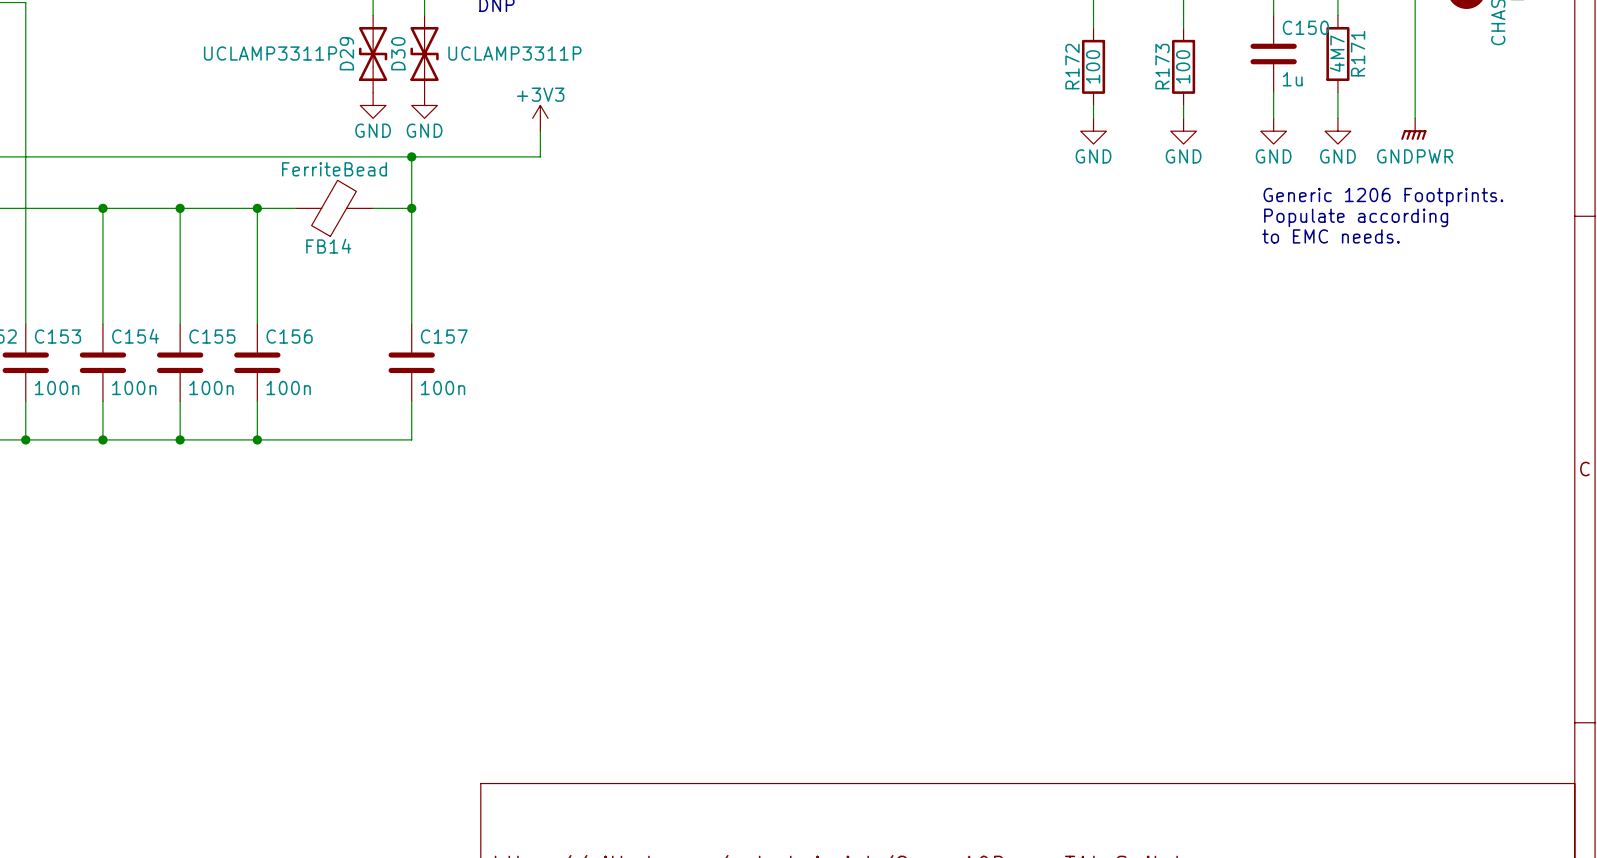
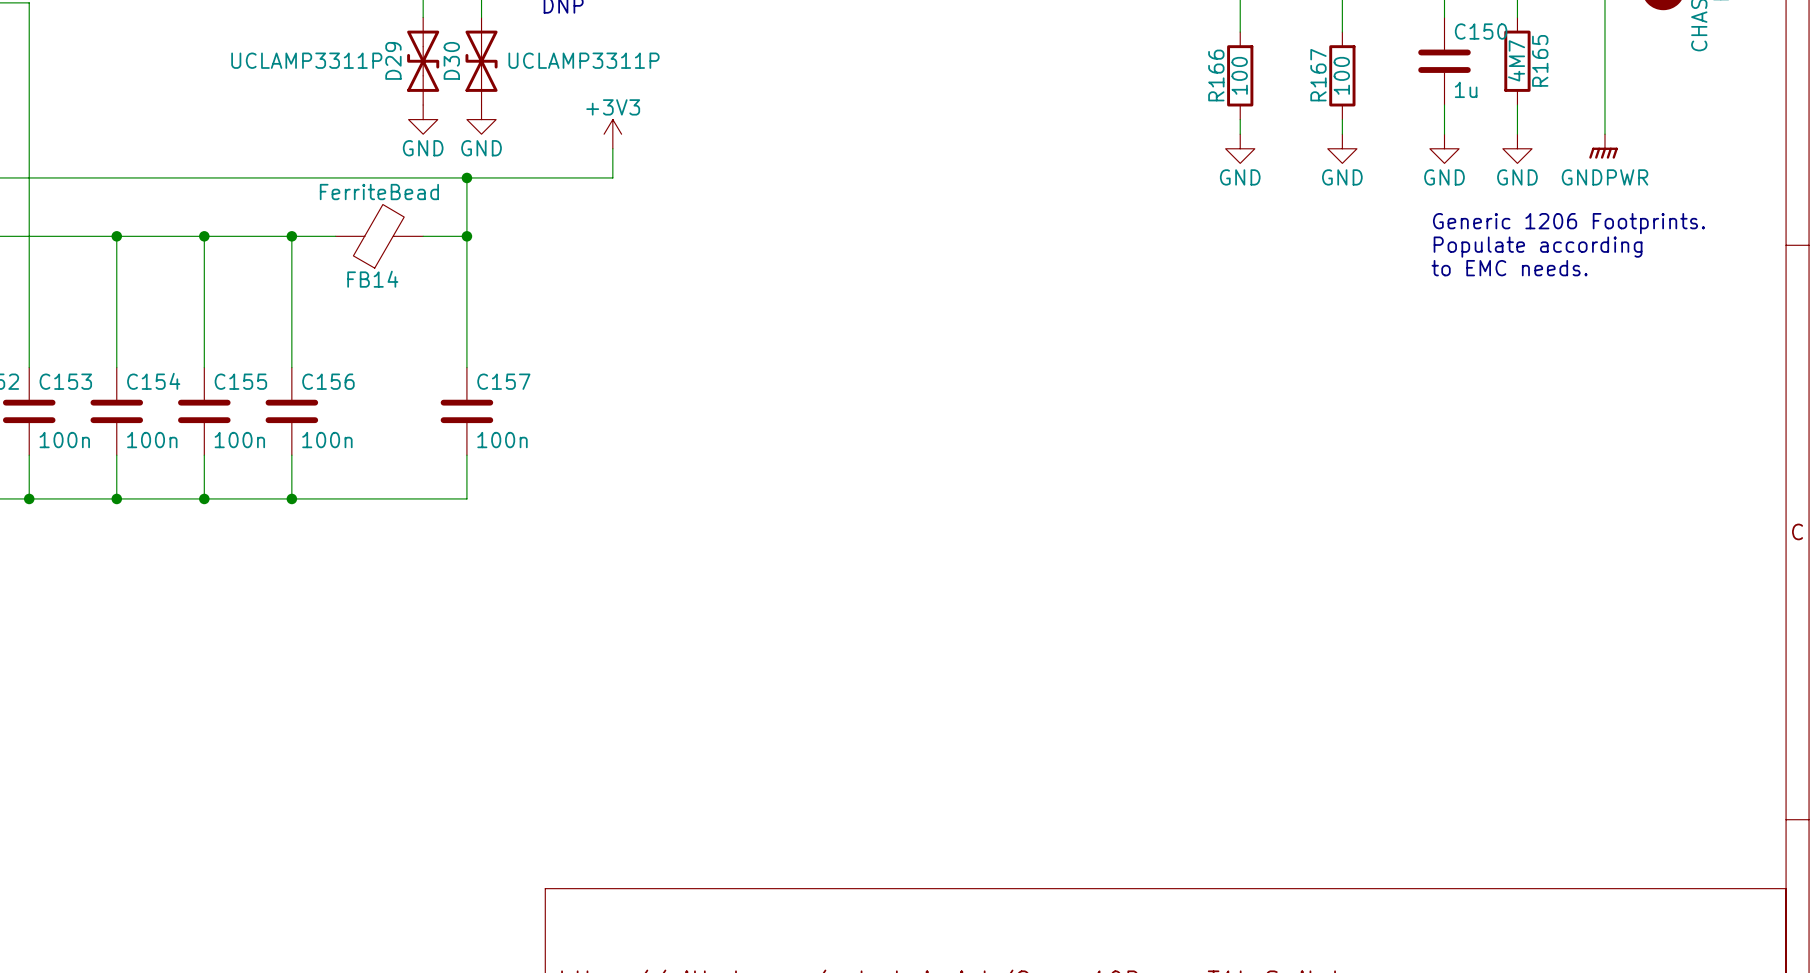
R171 name: R171 (1358, 53) -> R165 (1540, 60)
R172 name: R172 (1072, 66) -> R166 (1216, 75)
R173 name: R173 (1162, 66) -> R167 (1318, 75)

